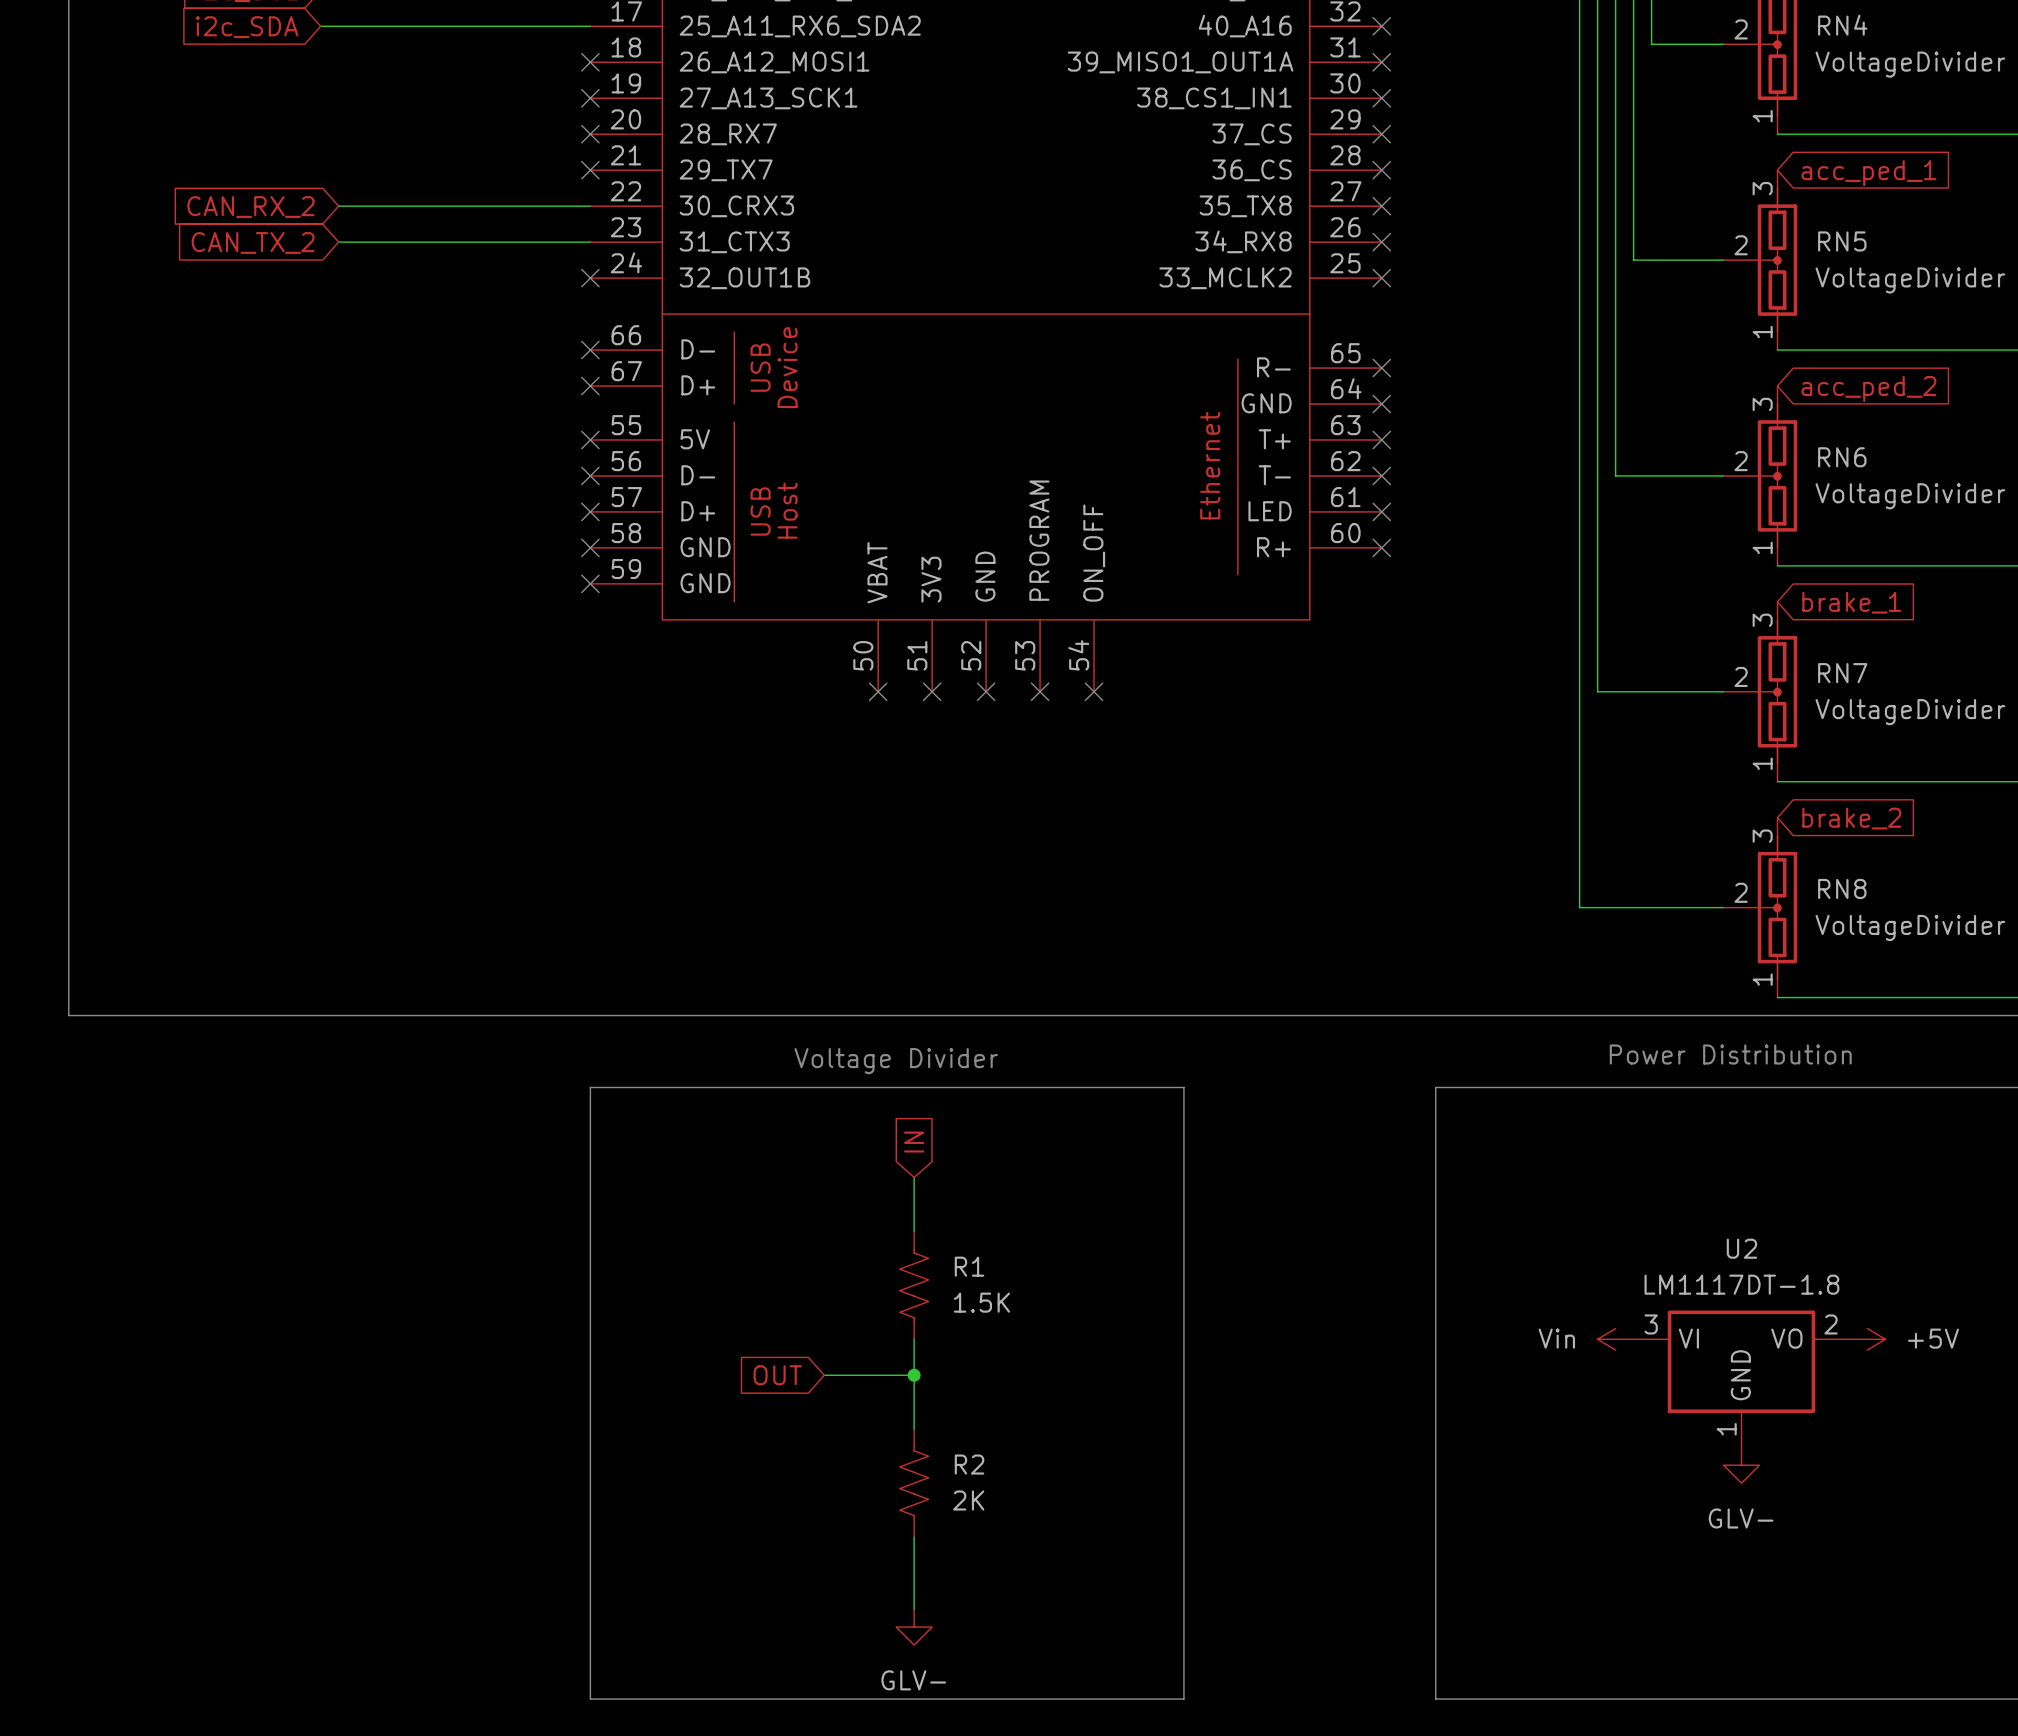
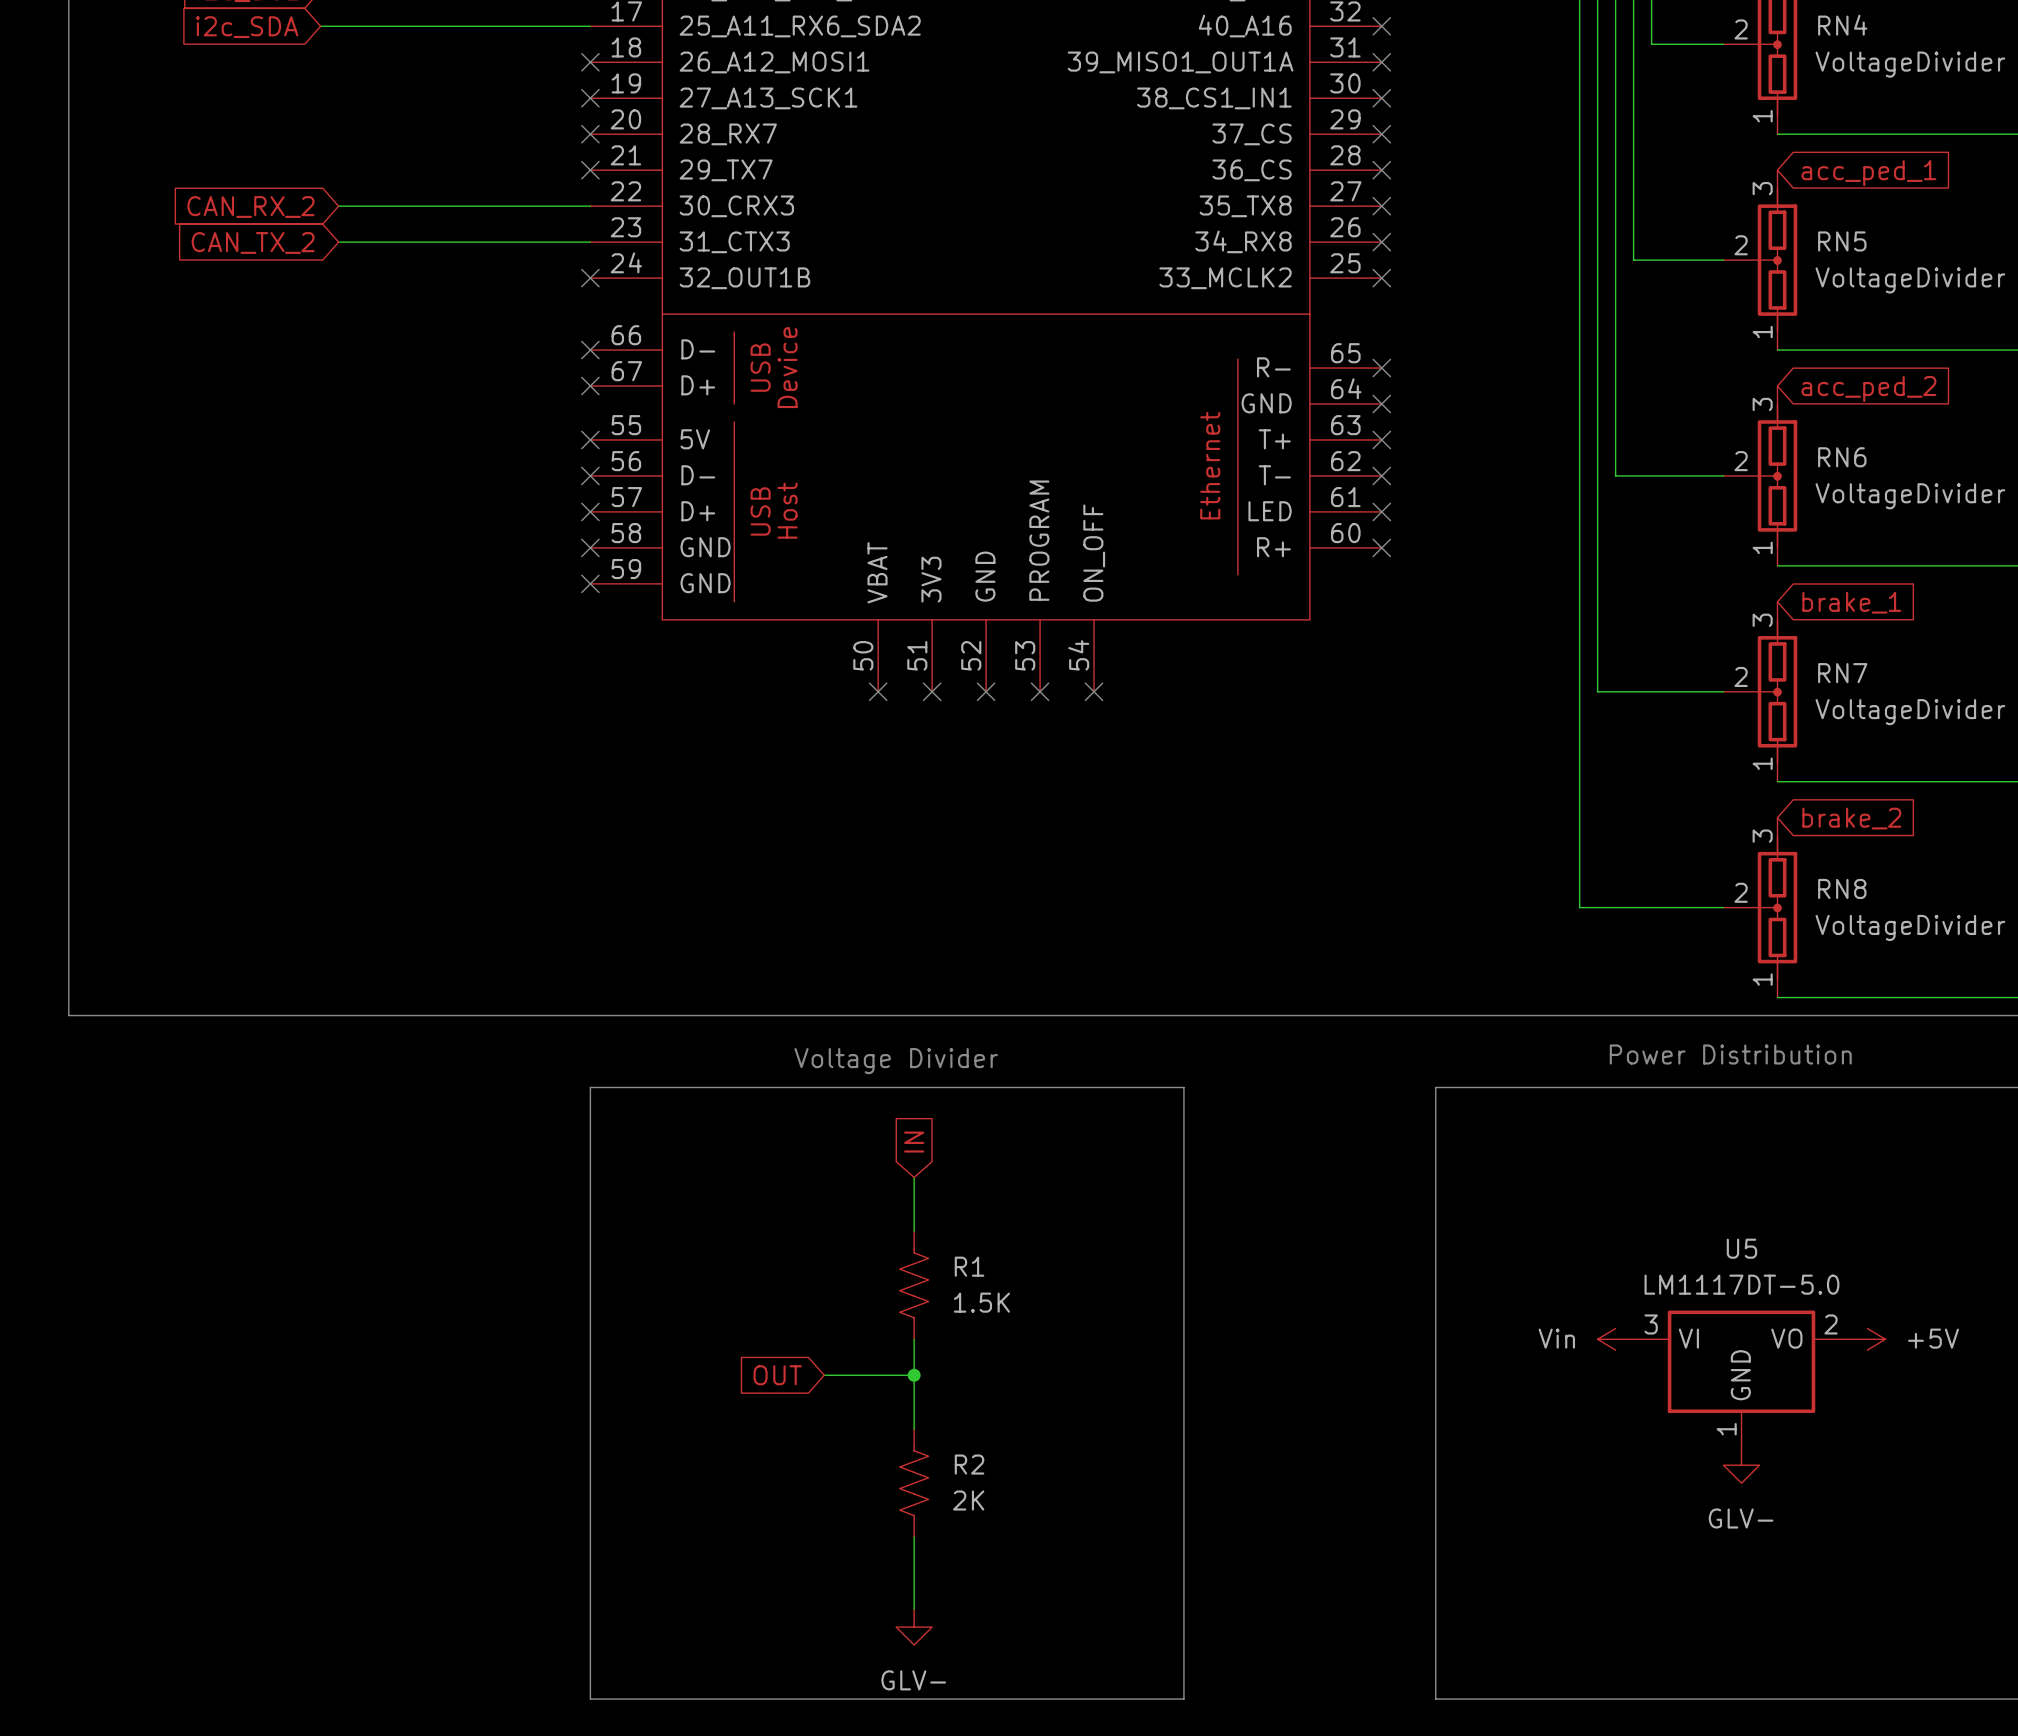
U2 name: U2 (1741, 1248) -> U5 (1741, 1248)
U2 value: LM1117DT-1.8 (1741, 1284) -> LM1117DT-5.0 (1741, 1284)

